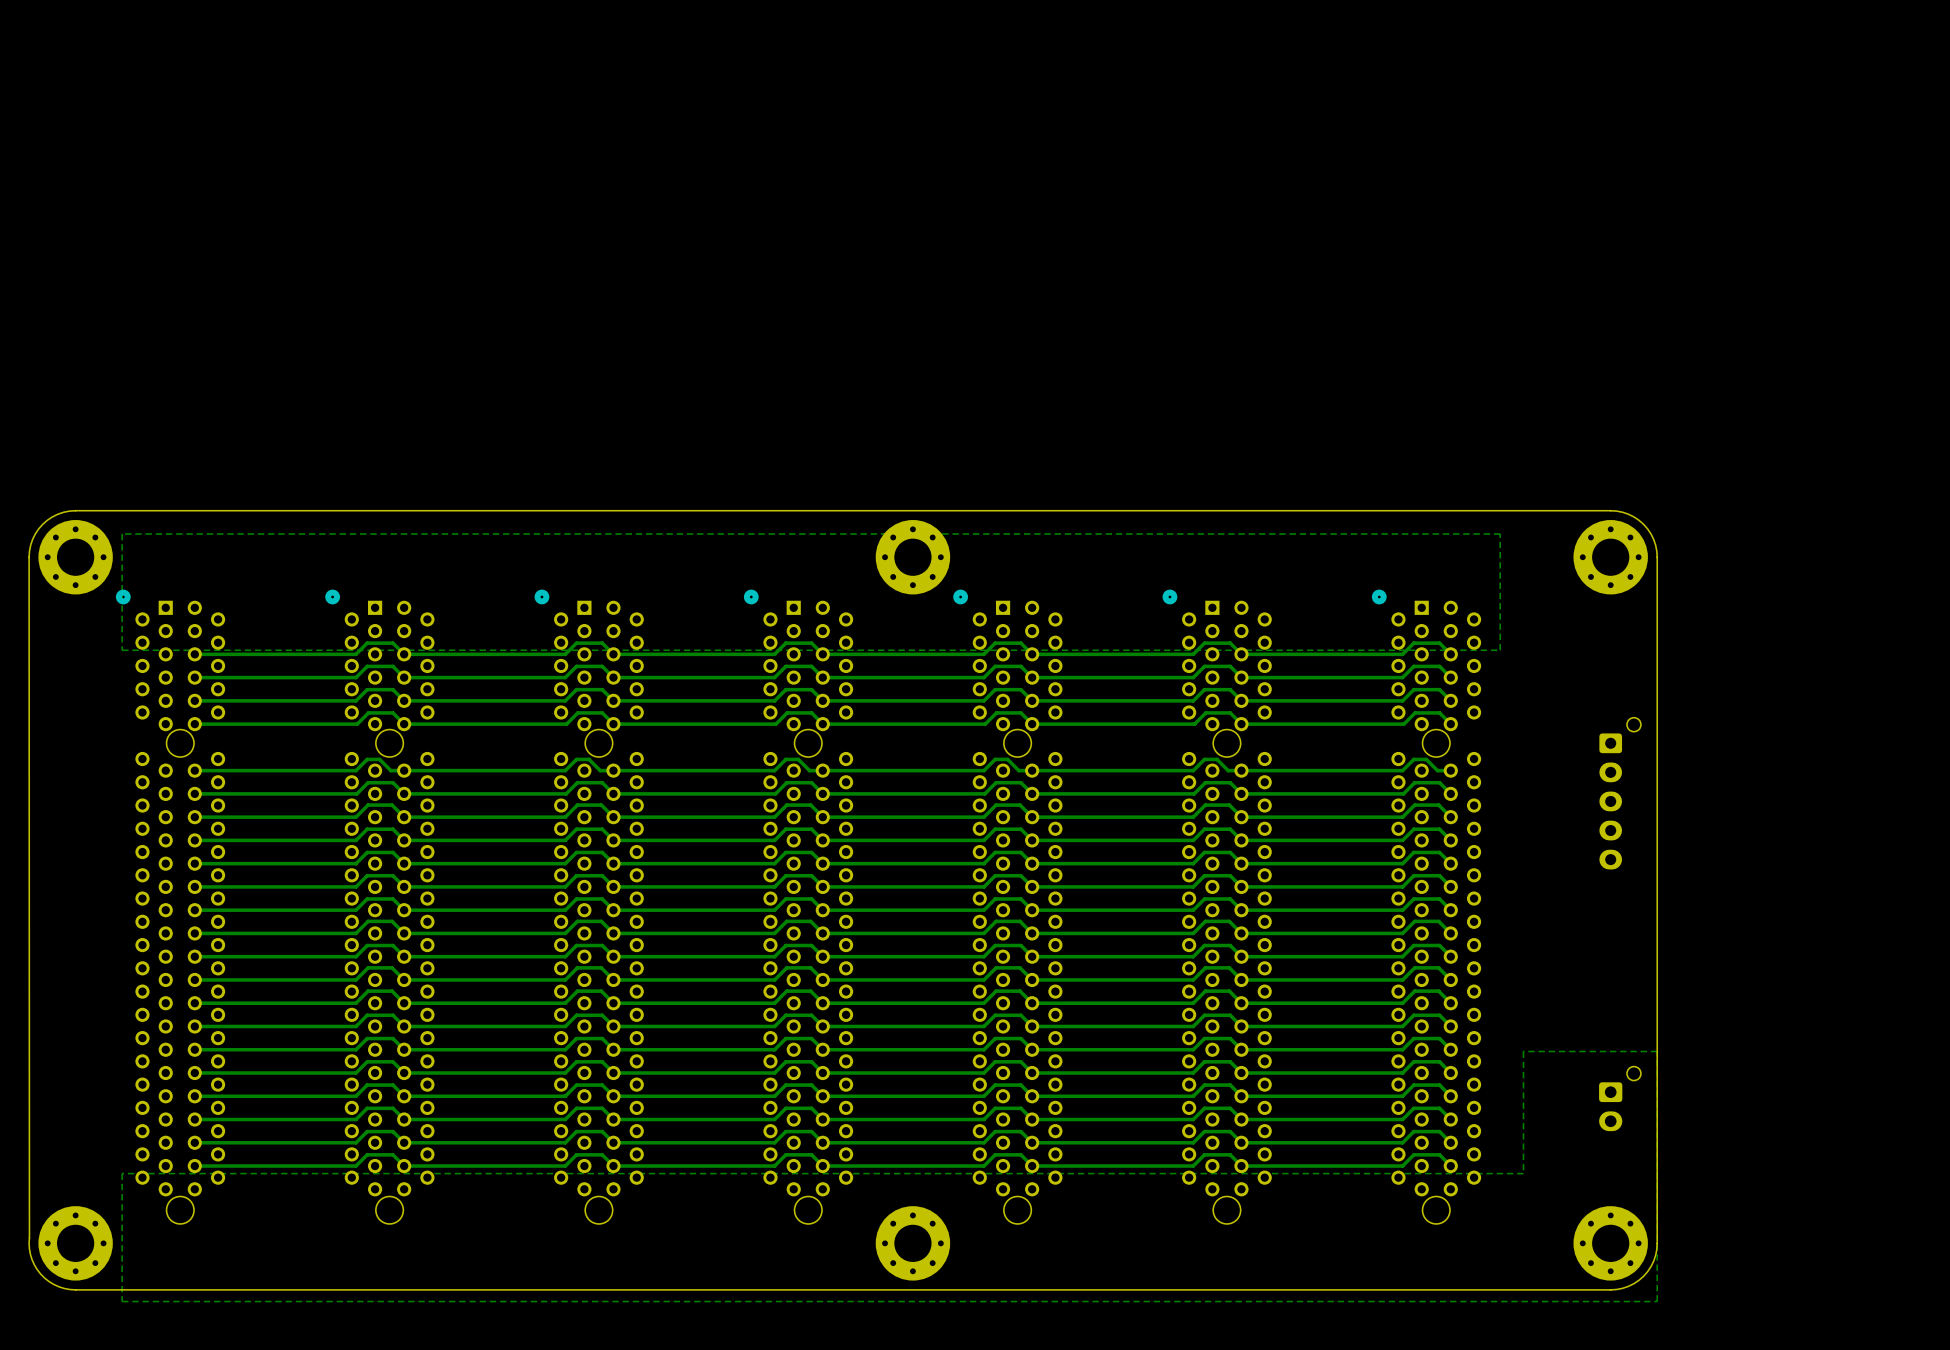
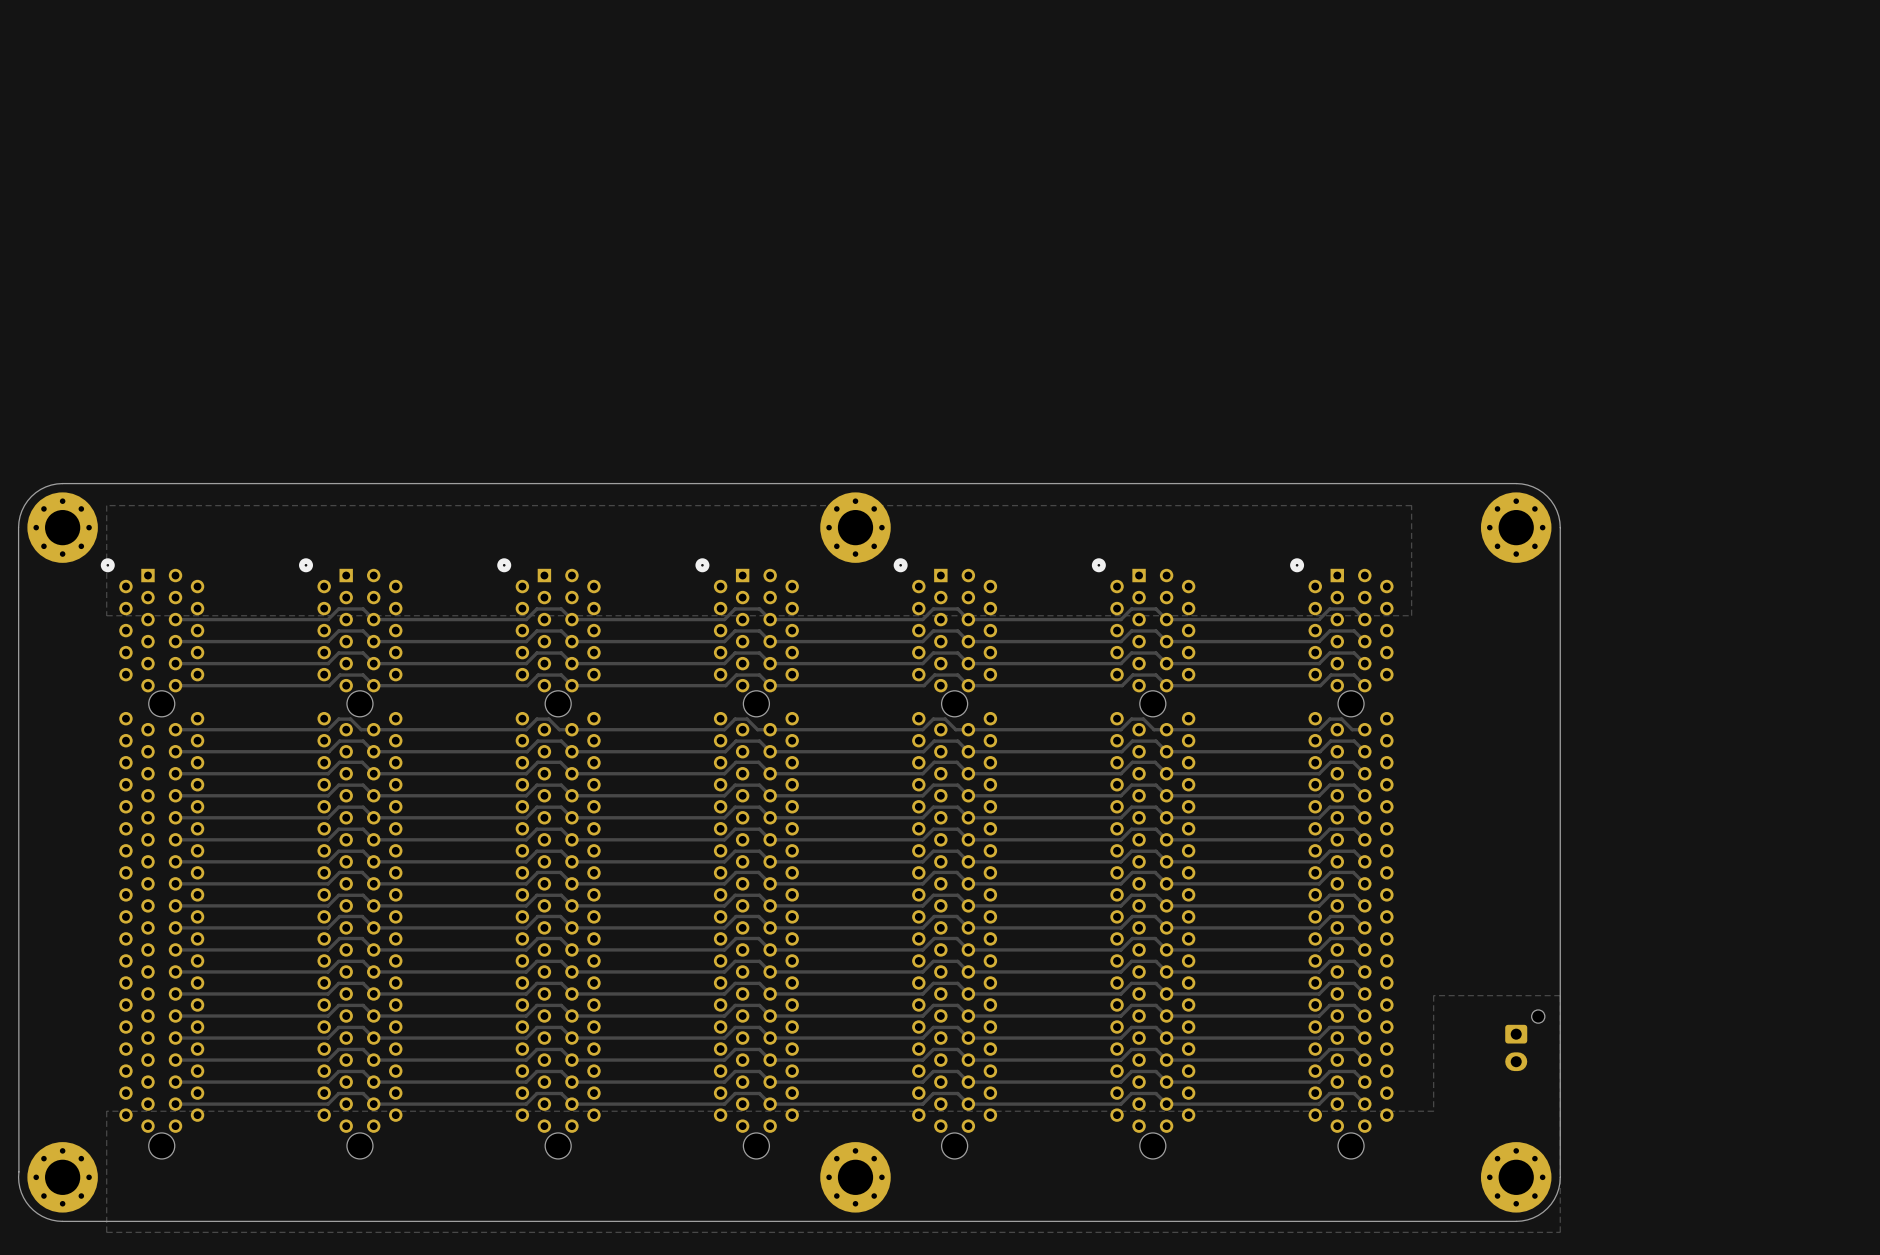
part: (1620, 793) -> none

